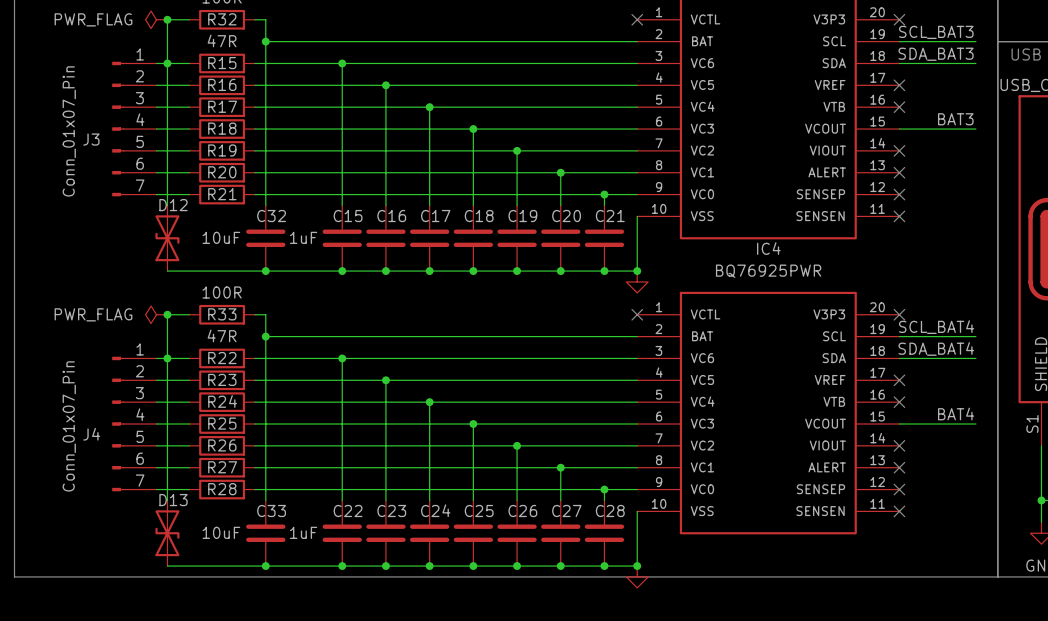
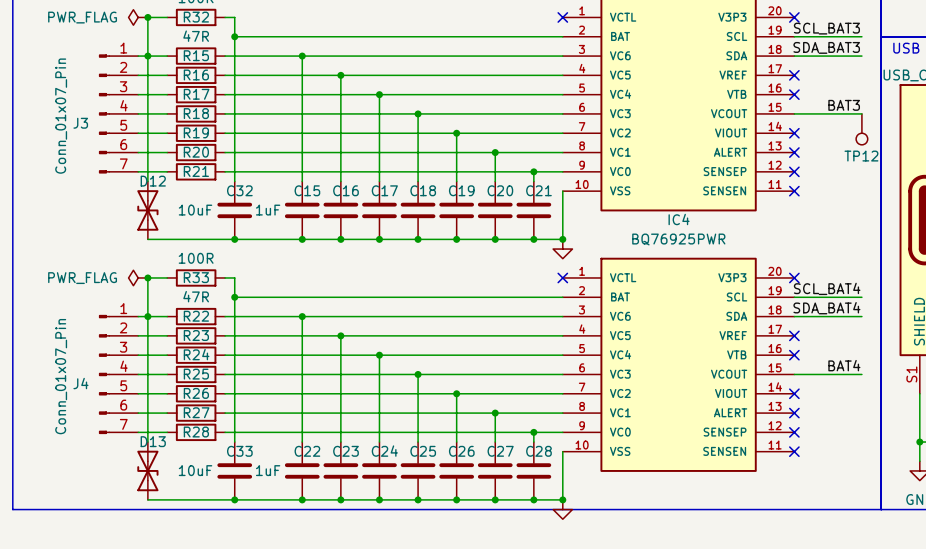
TP12: none -> (861, 129)

